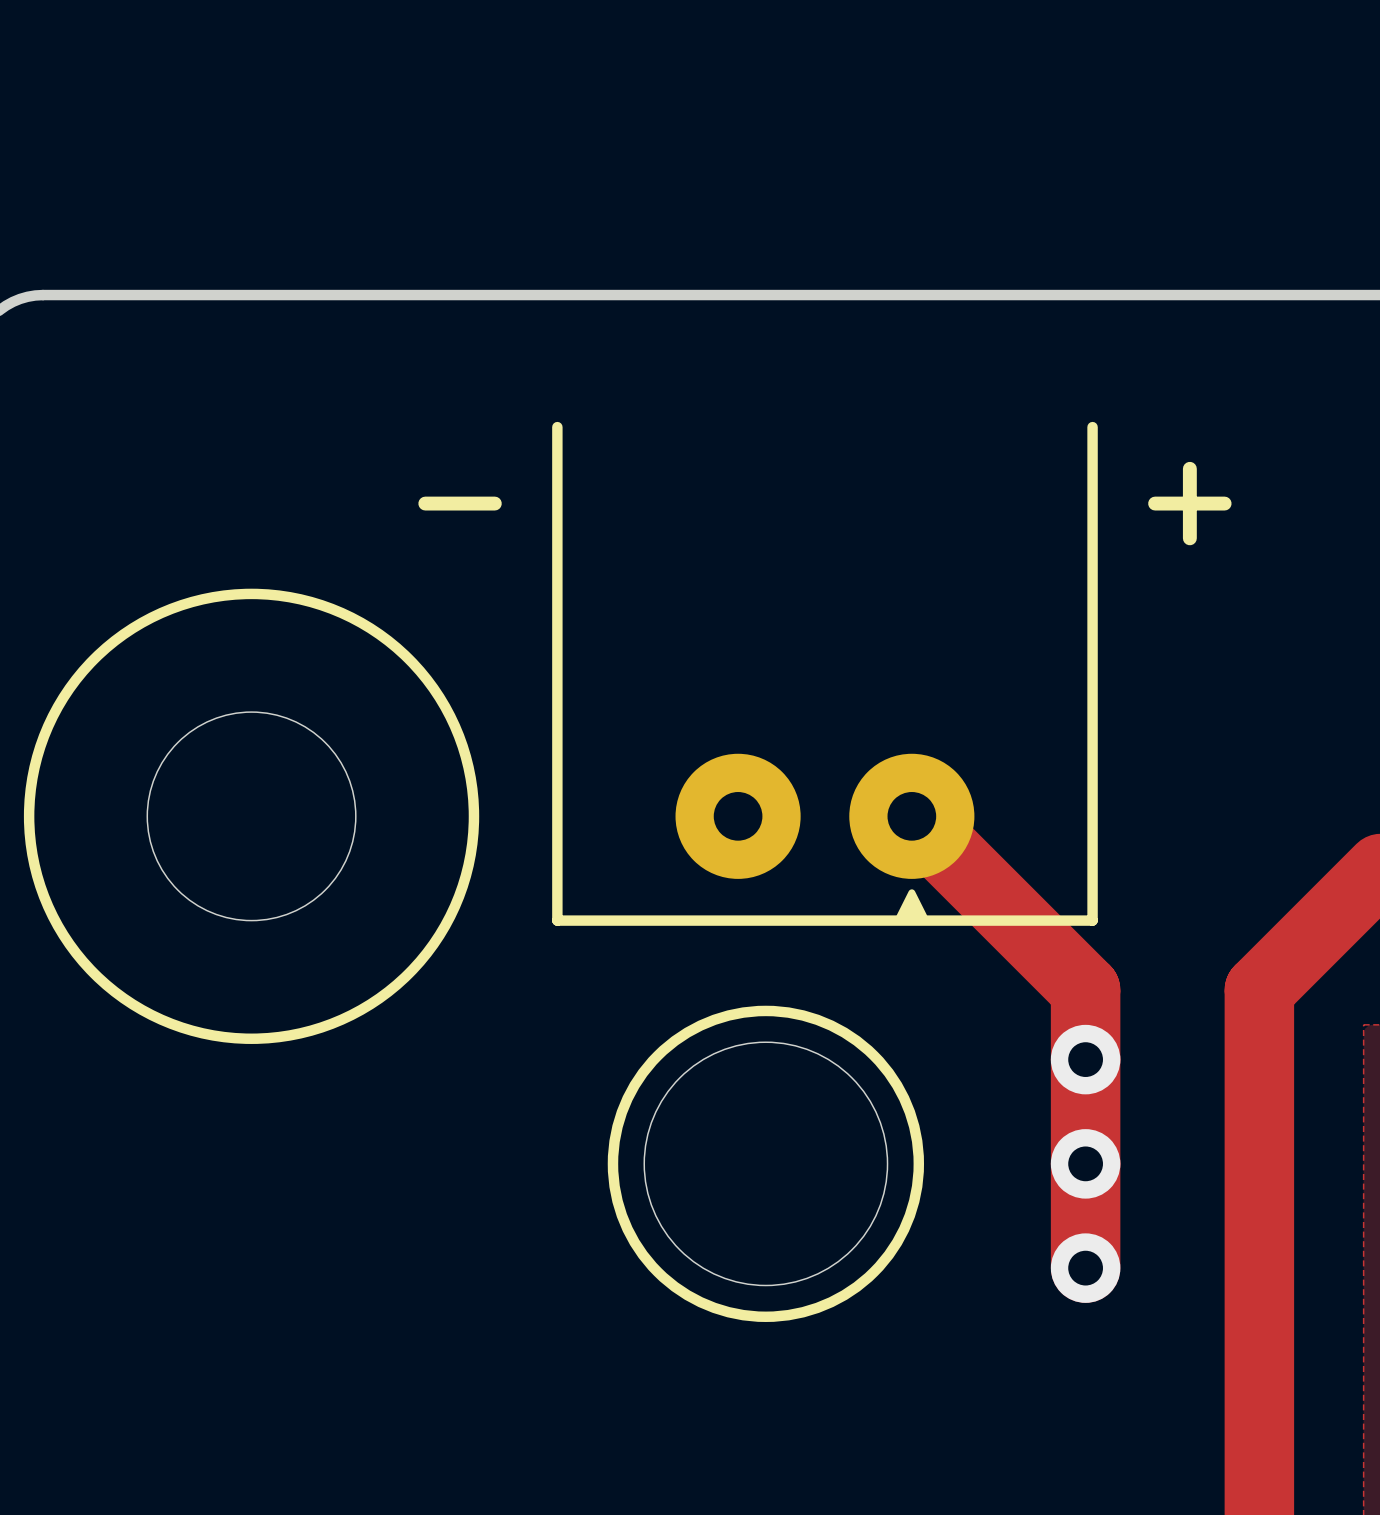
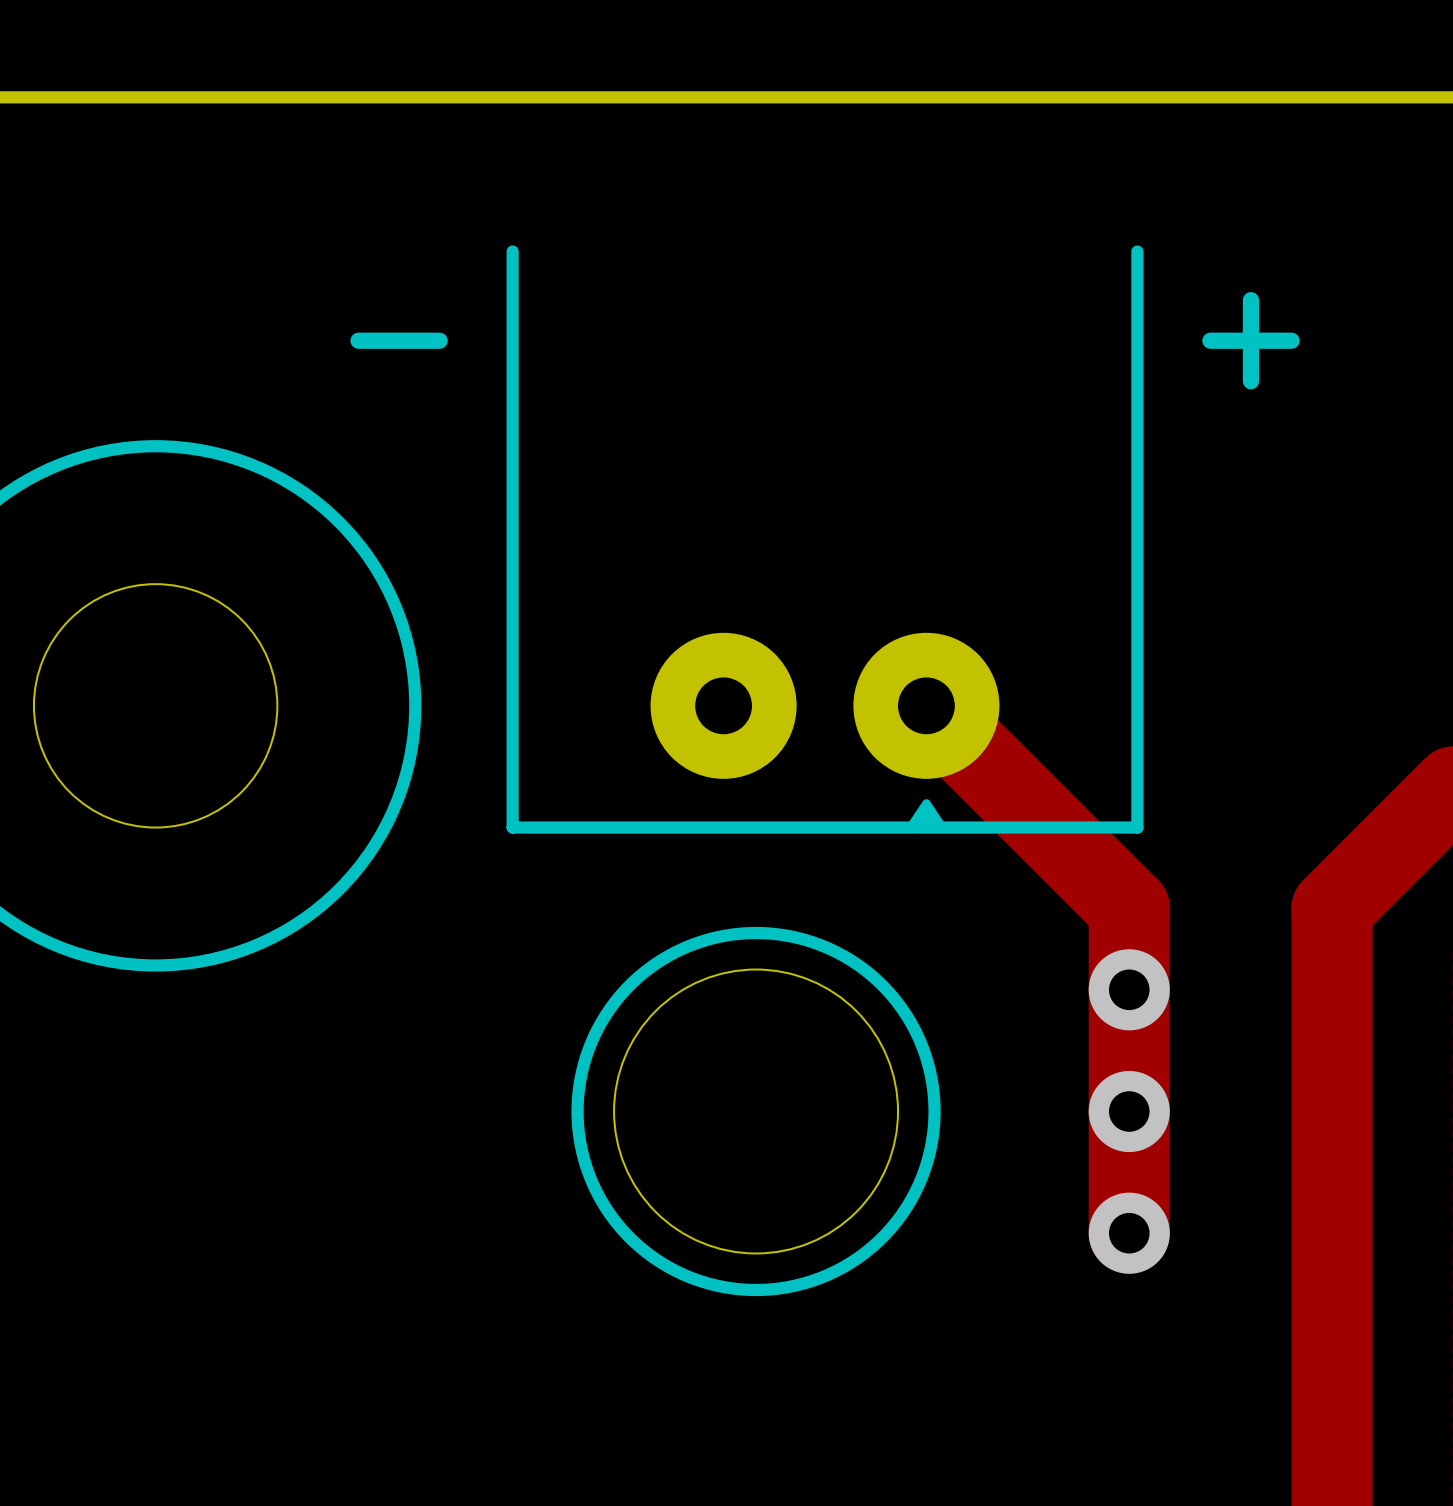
part footprint: [552, 421, 1098, 926] -> [506, 245, 1144, 834]

